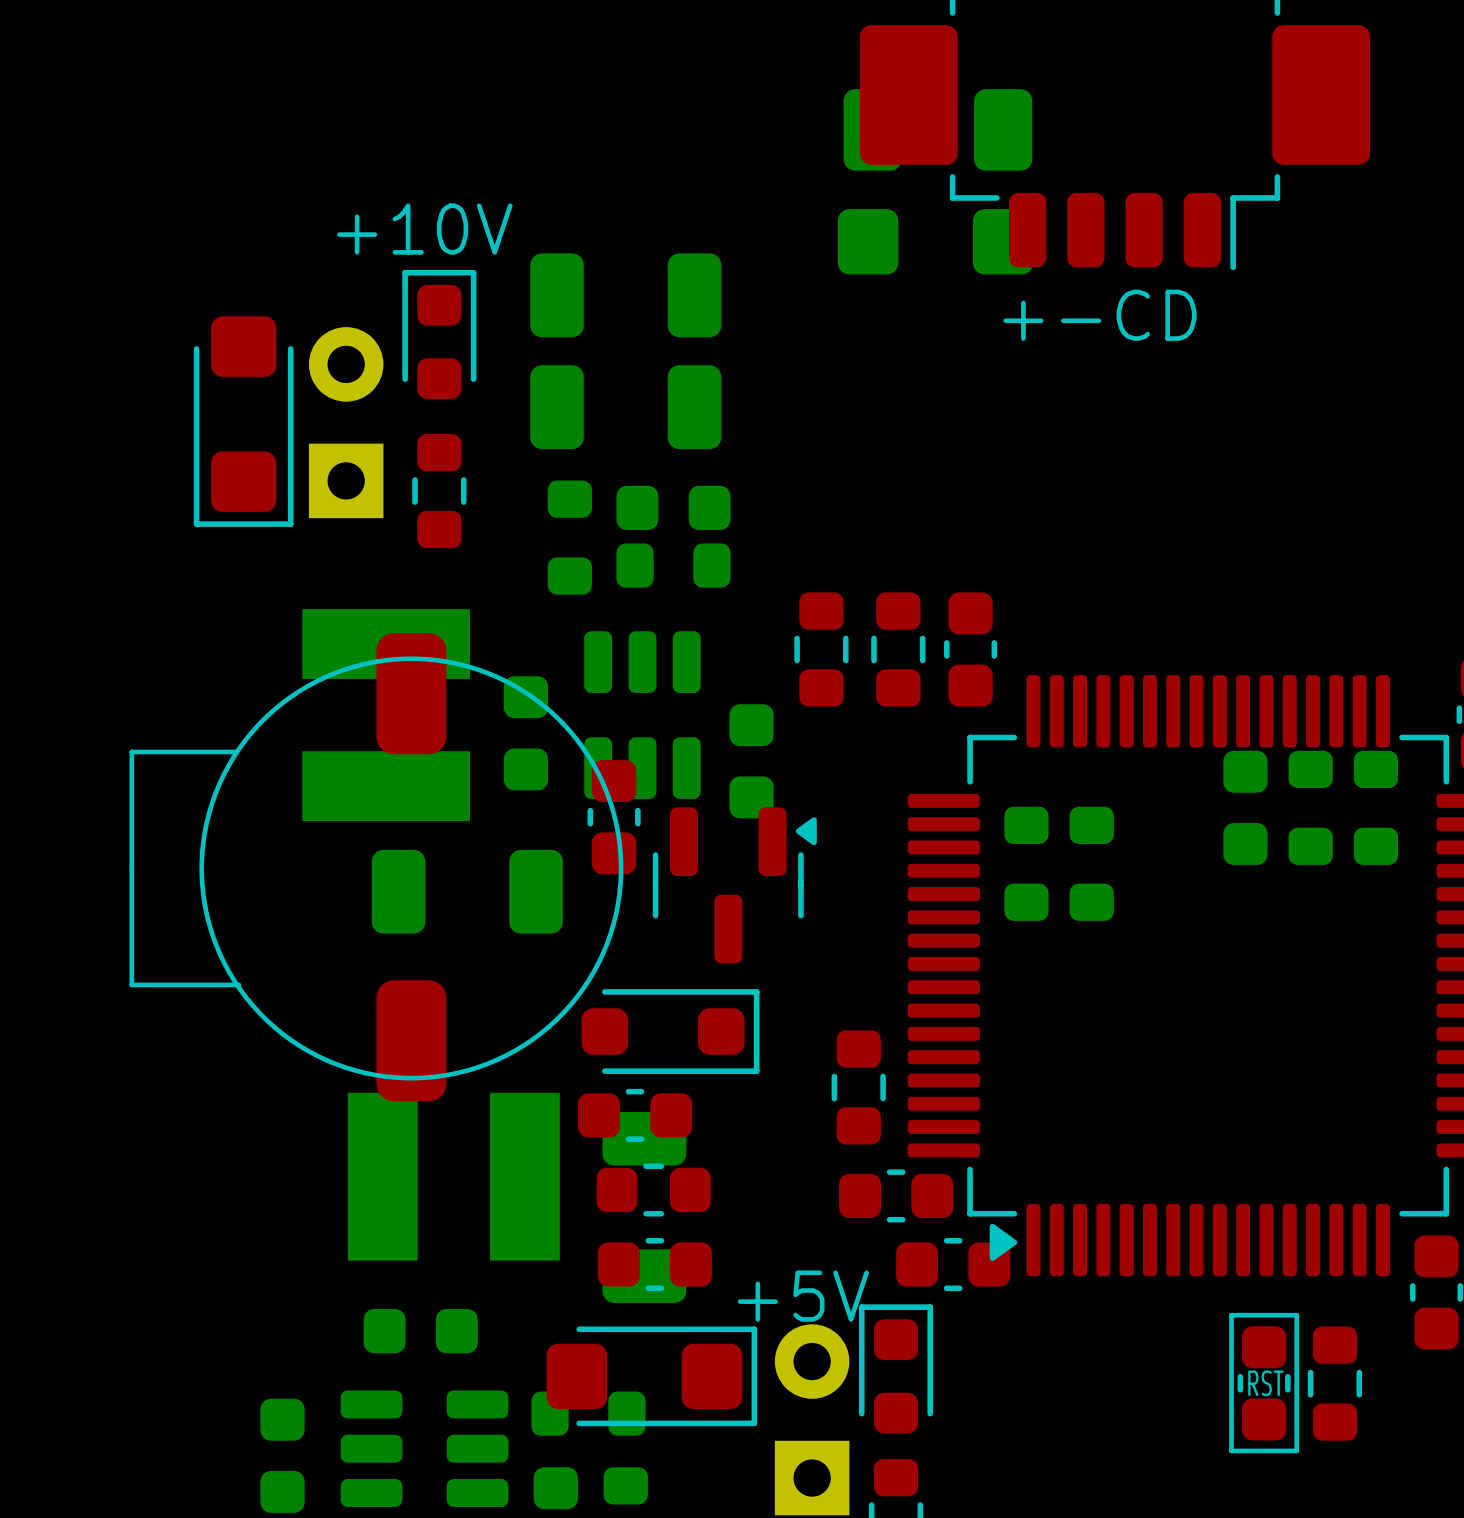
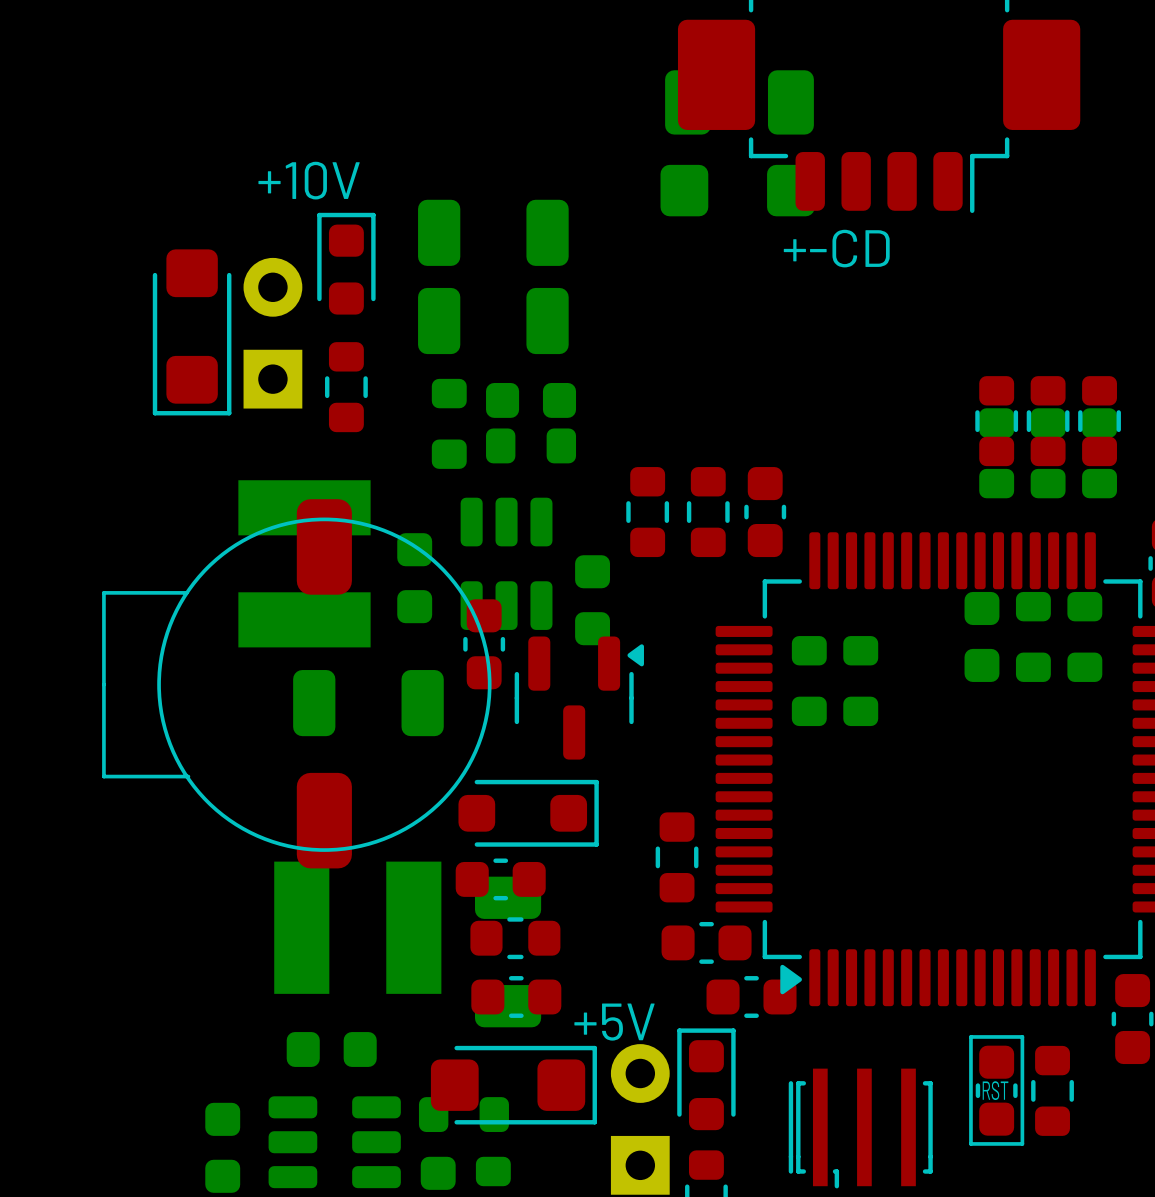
part: none -> (996, 421)
part: none -> (1048, 421)
part: none -> (1099, 421)
part: none -> (996, 453)
part: none -> (1048, 453)
part: none -> (1099, 453)
part: none -> (860, 1128)

